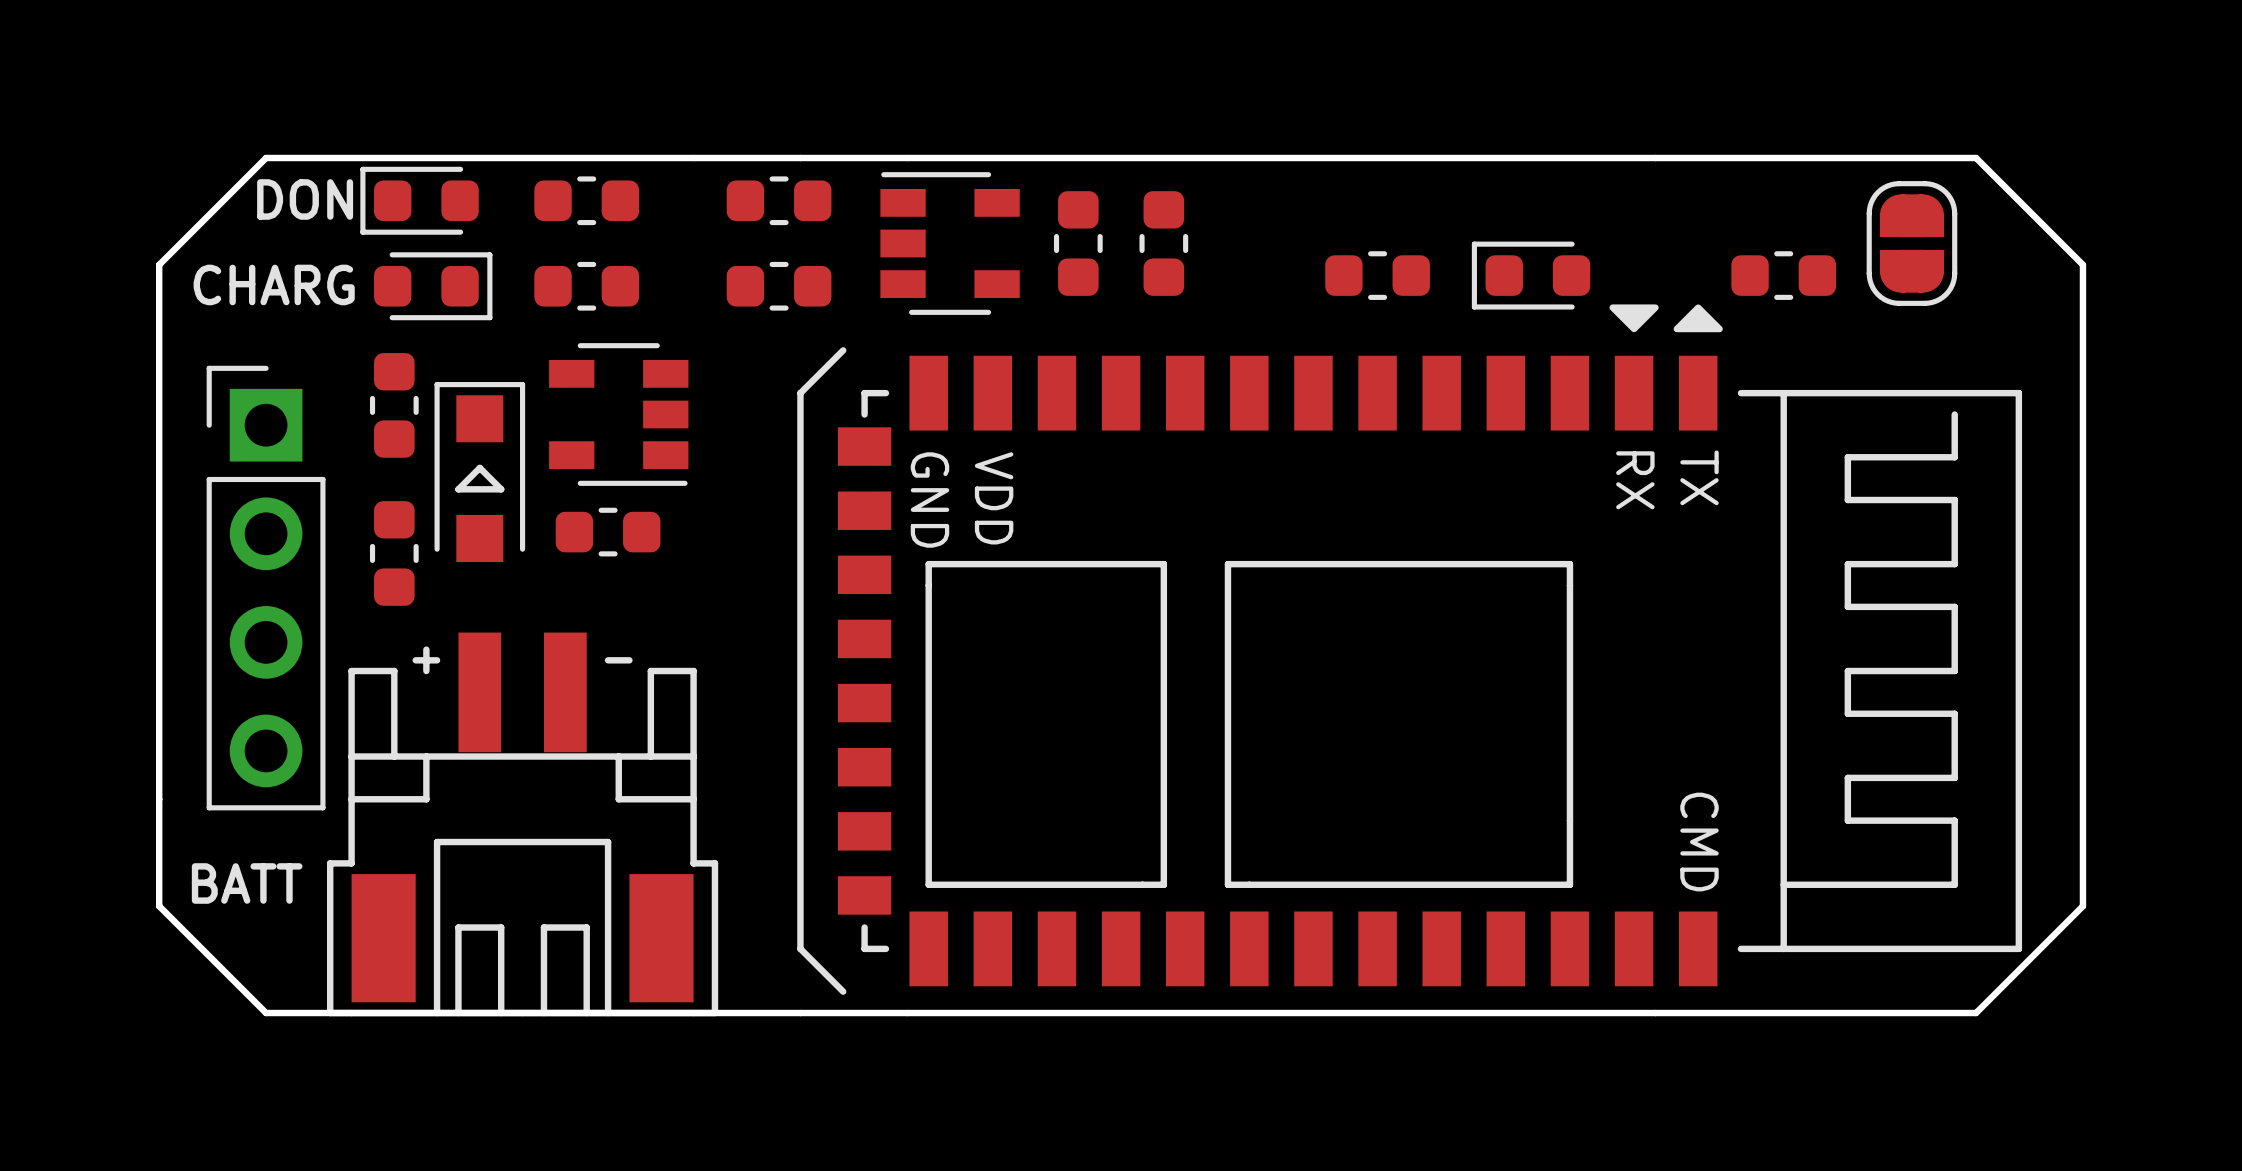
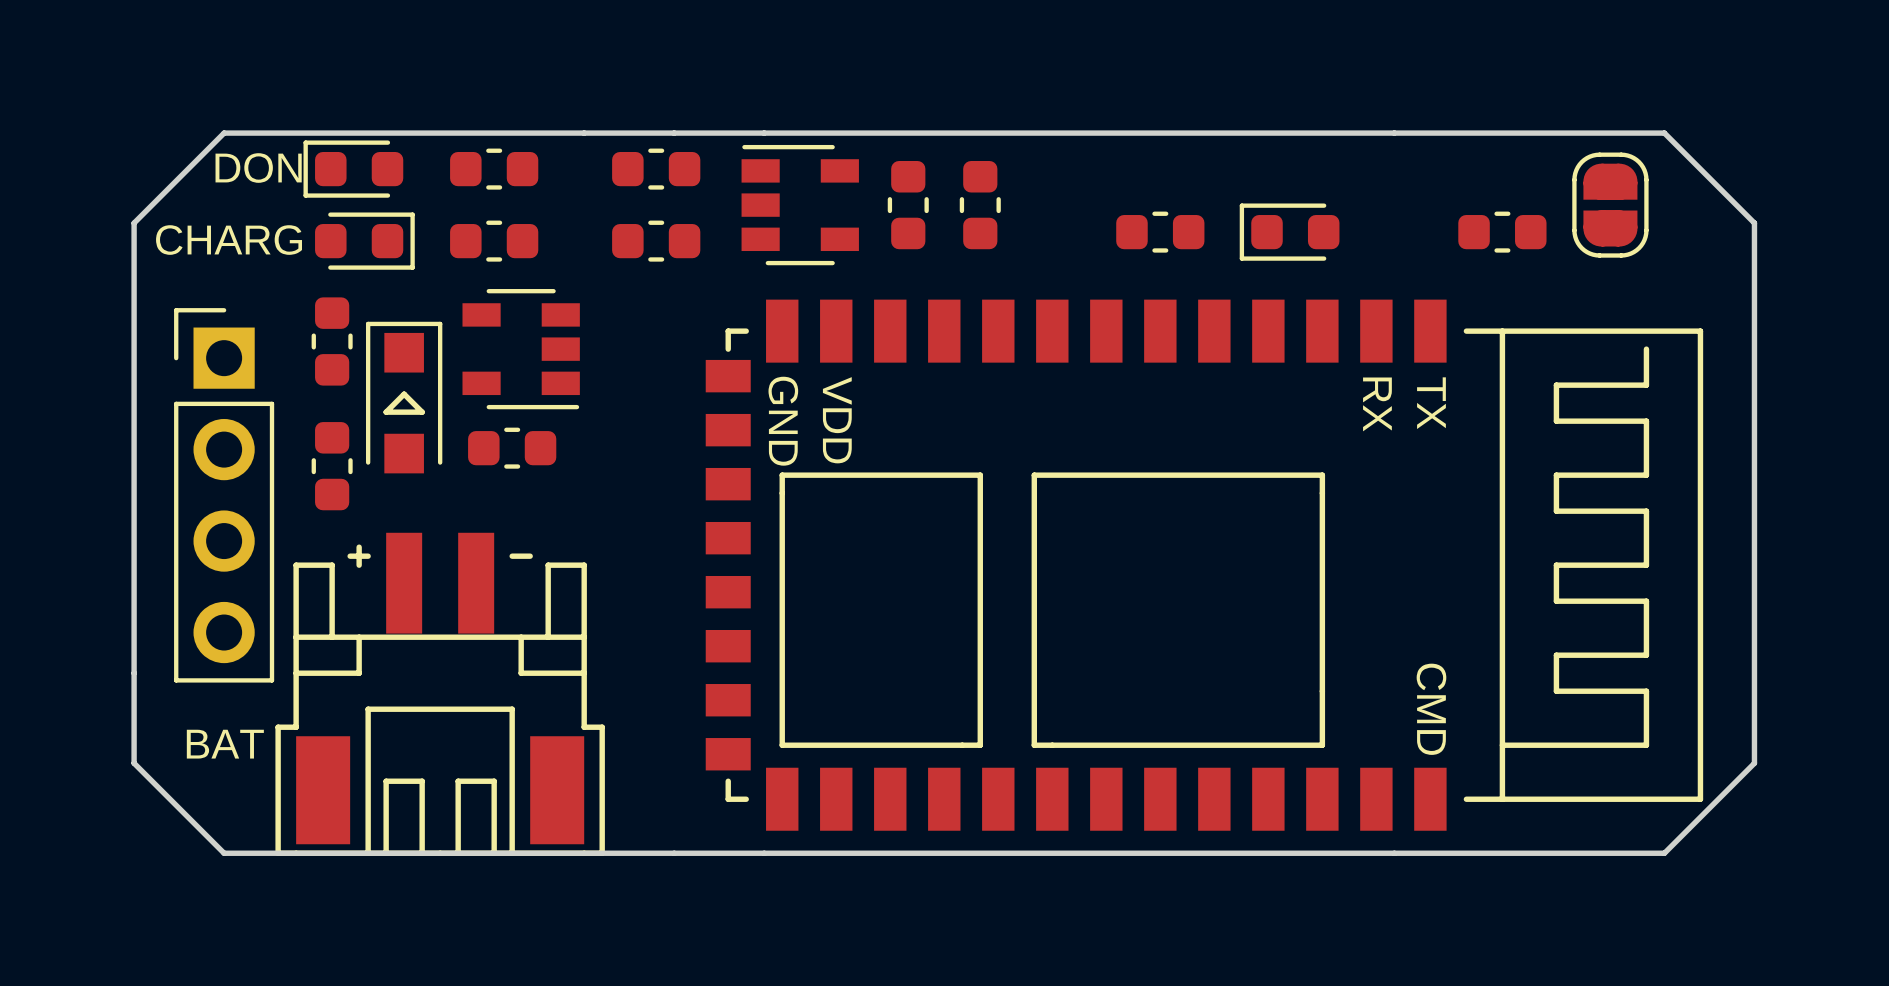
drawing: [1609, 304, 1723, 333] -> none
line: (843, 350) (800, 393) (800, 948) (843, 991) -> none
text: BATT (247, 883) -> BAT (225, 744)

